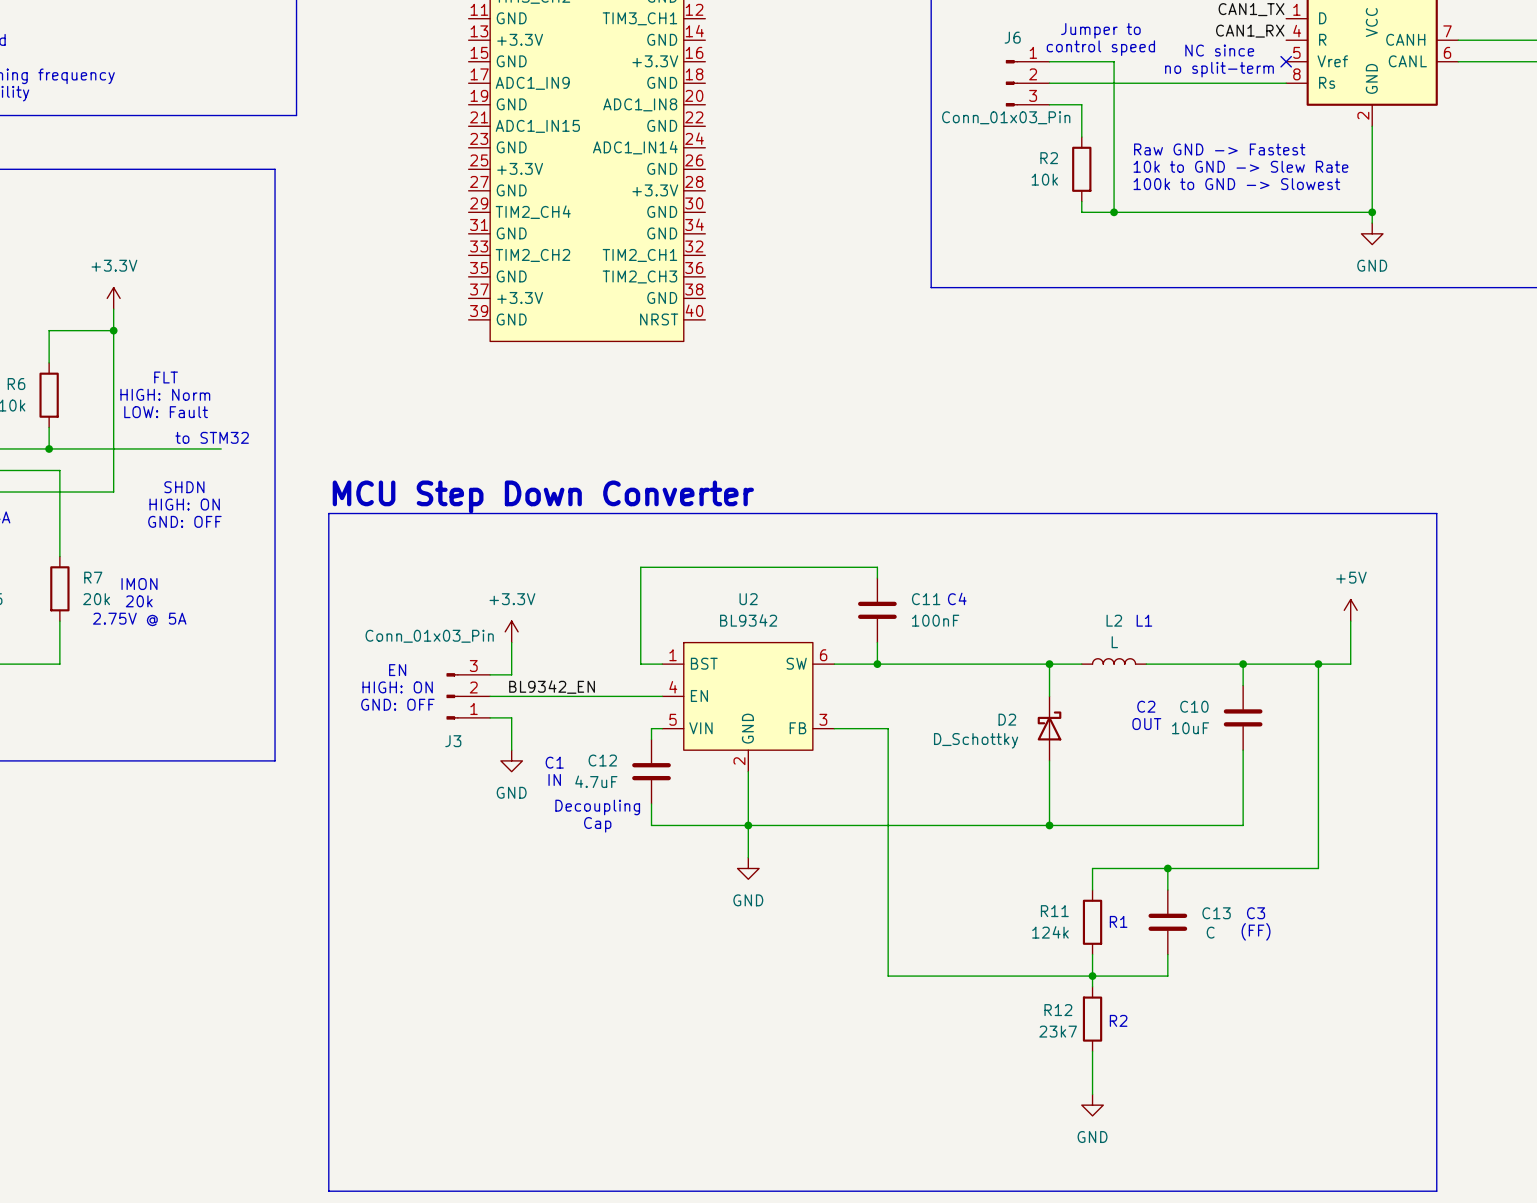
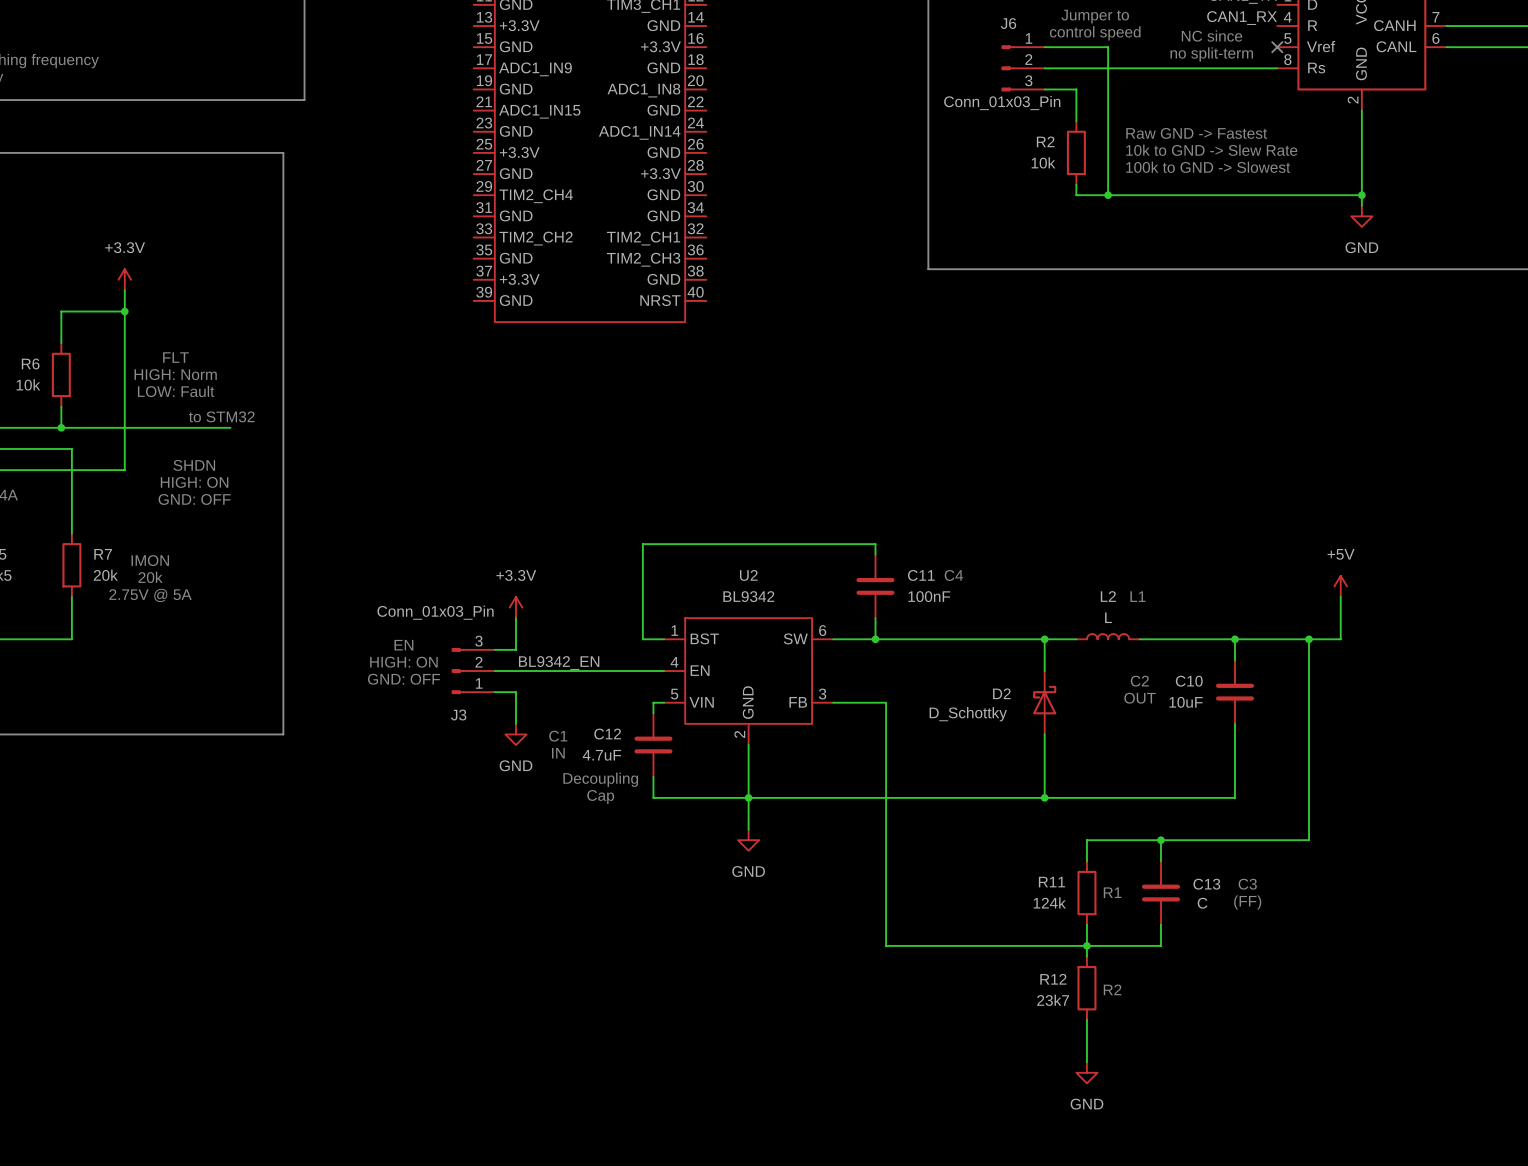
text: MCU Step Down Converter (543, 496) -> none
line: (328, 513) (1436, 513) (1436, 1191) (328, 1191) (328, 513) -> none

